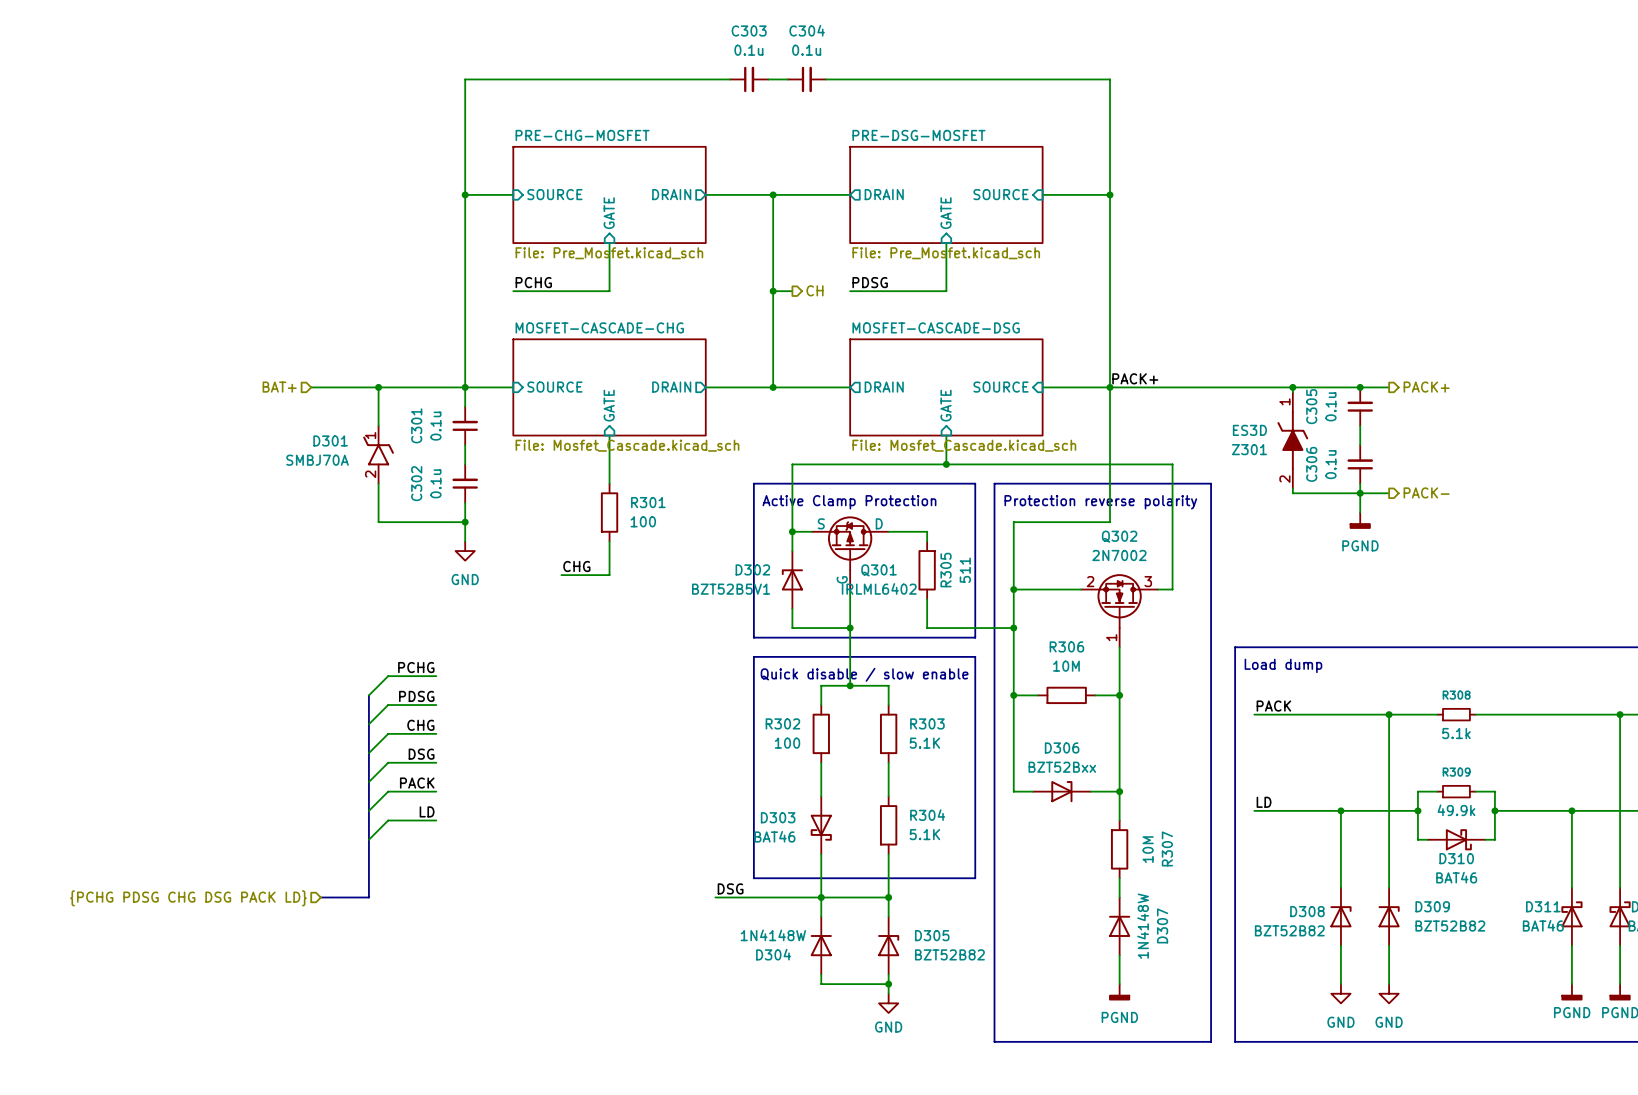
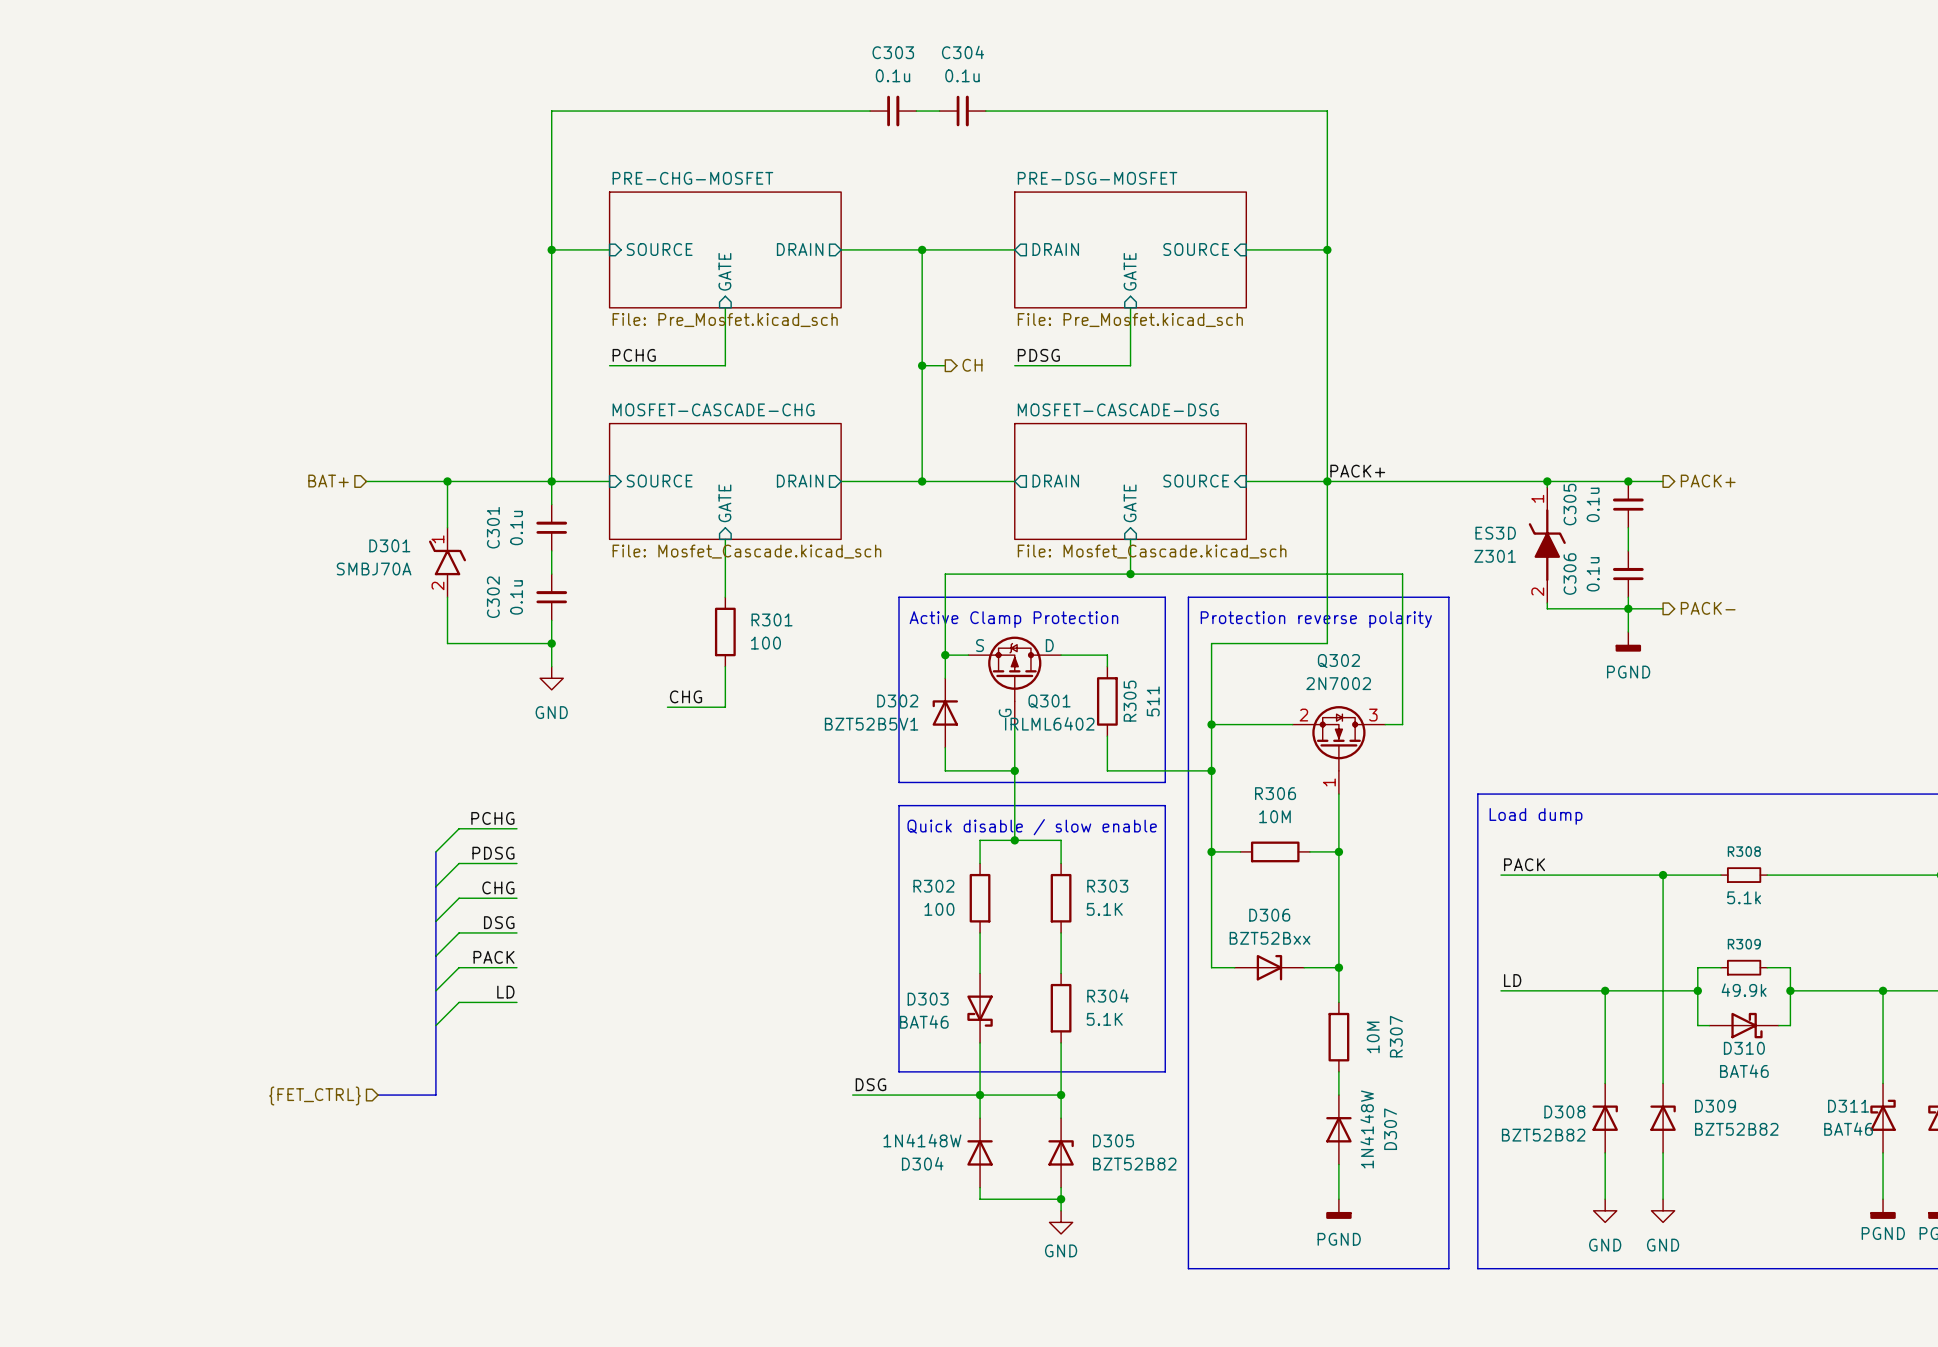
hierarchical label: {PCHG PDSG CHG DSG PACK LD} (188, 898) -> {FET_CTRL} (315, 1095)

